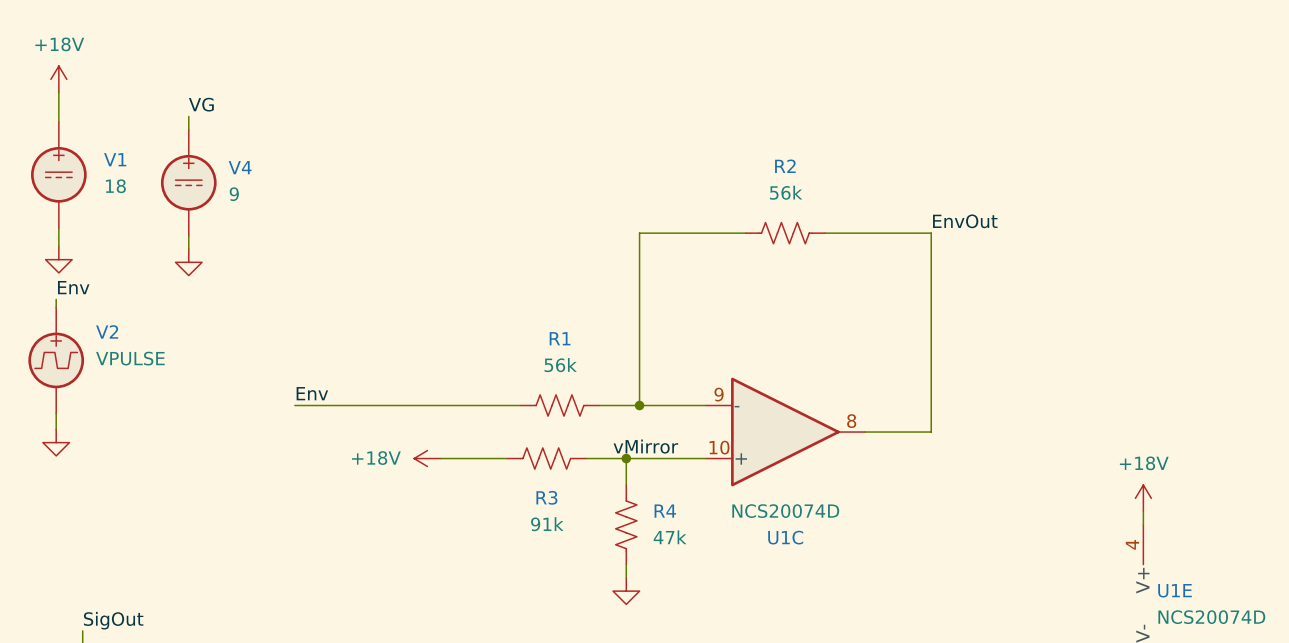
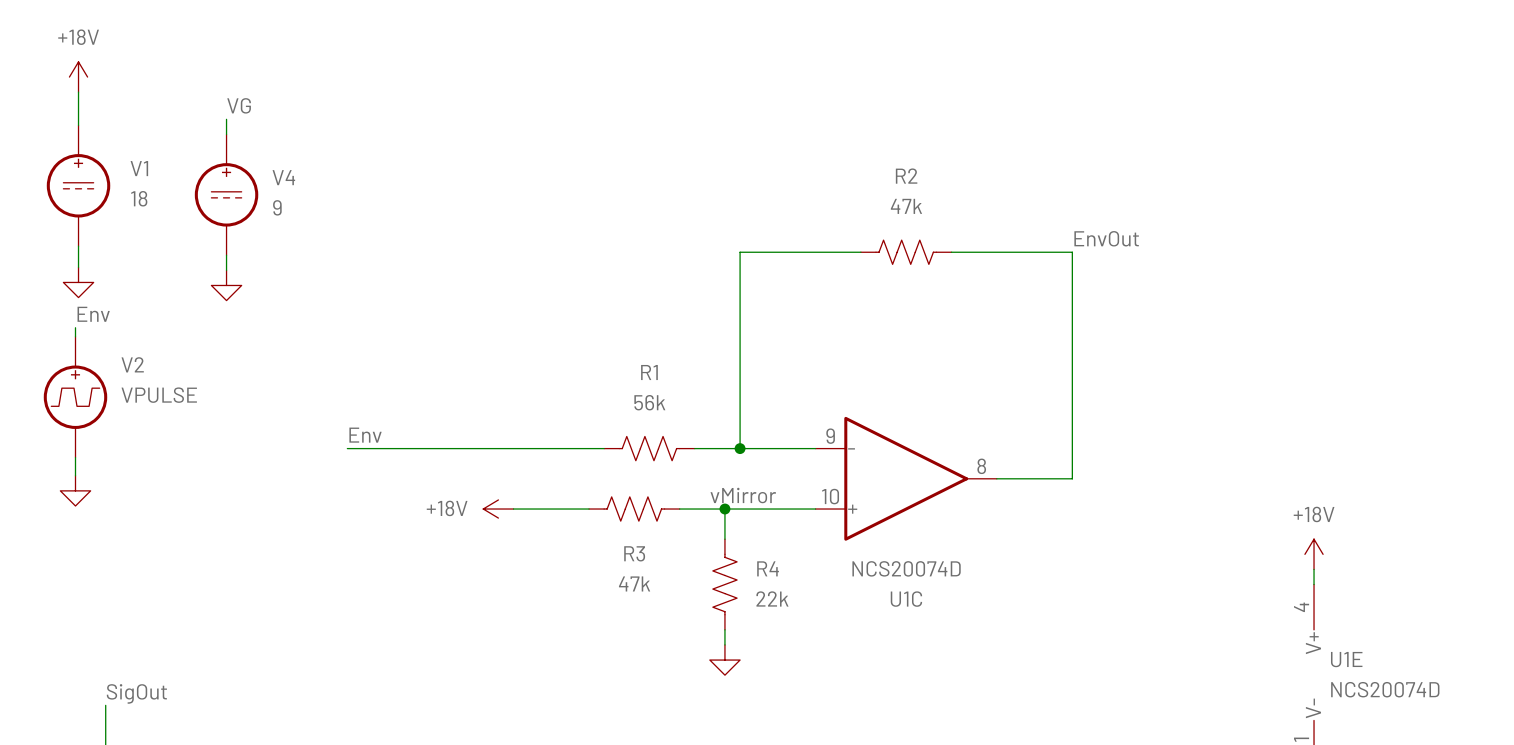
R2 value: 56k (786, 192) -> 47k (906, 206)
R3 value: 91k (547, 524) -> 47k (634, 583)
R4 value: 47k (670, 537) -> 22k (772, 598)

